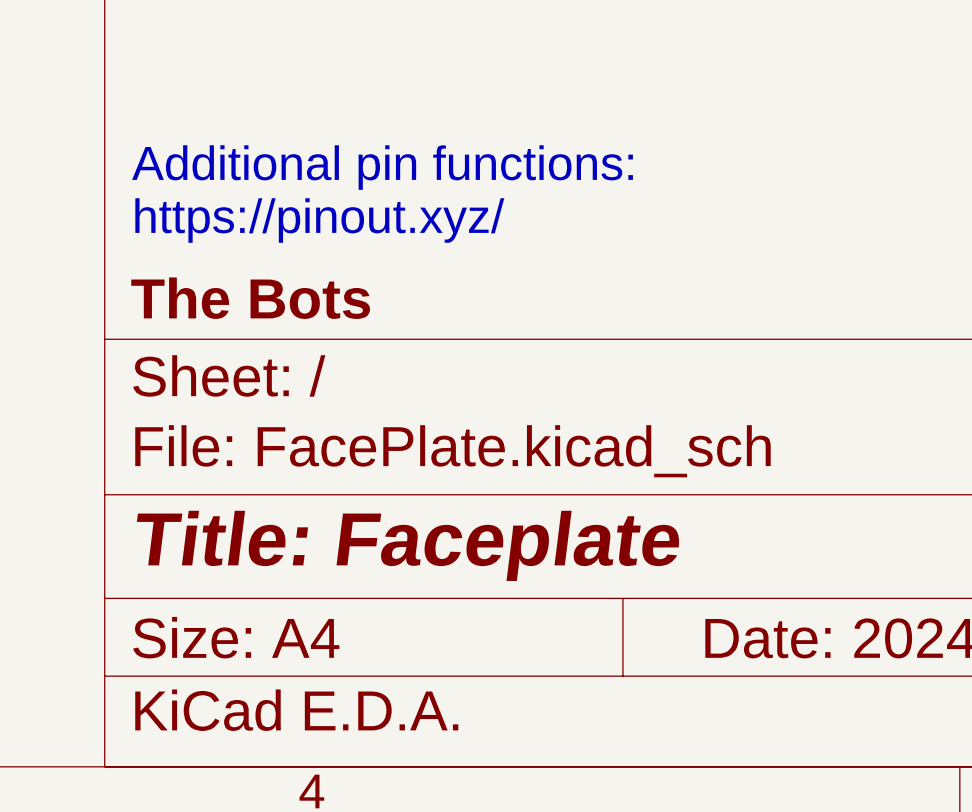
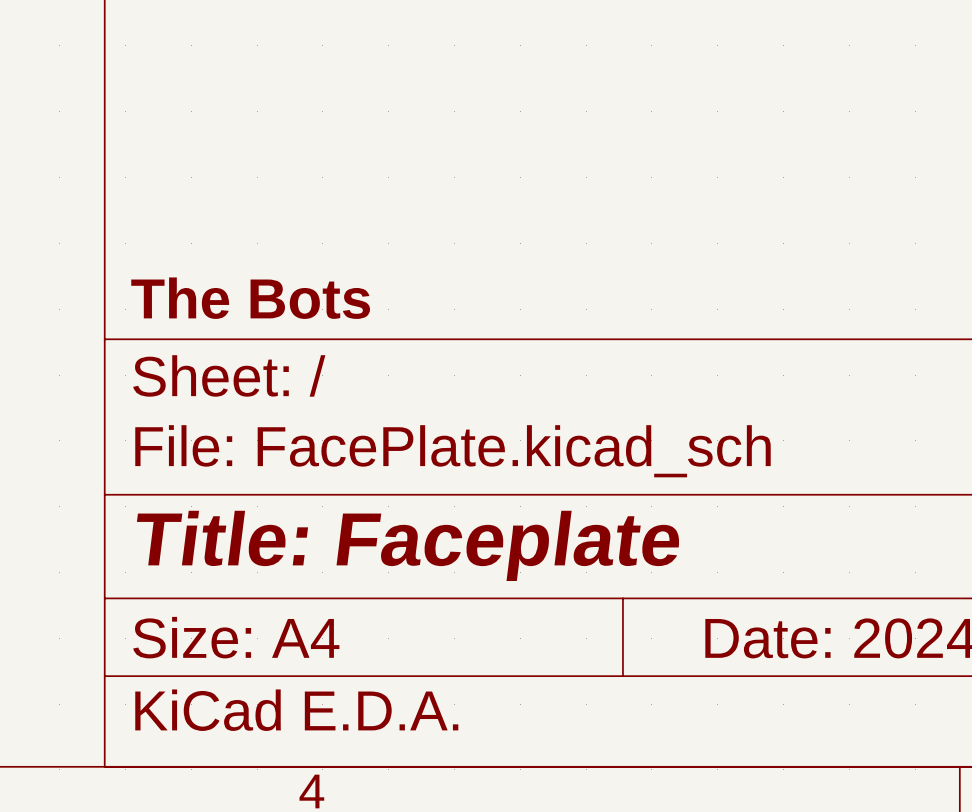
text: Additional pin functions: (382, 167) -> none
text: https://pinout.xyz/ (319, 220) -> none

